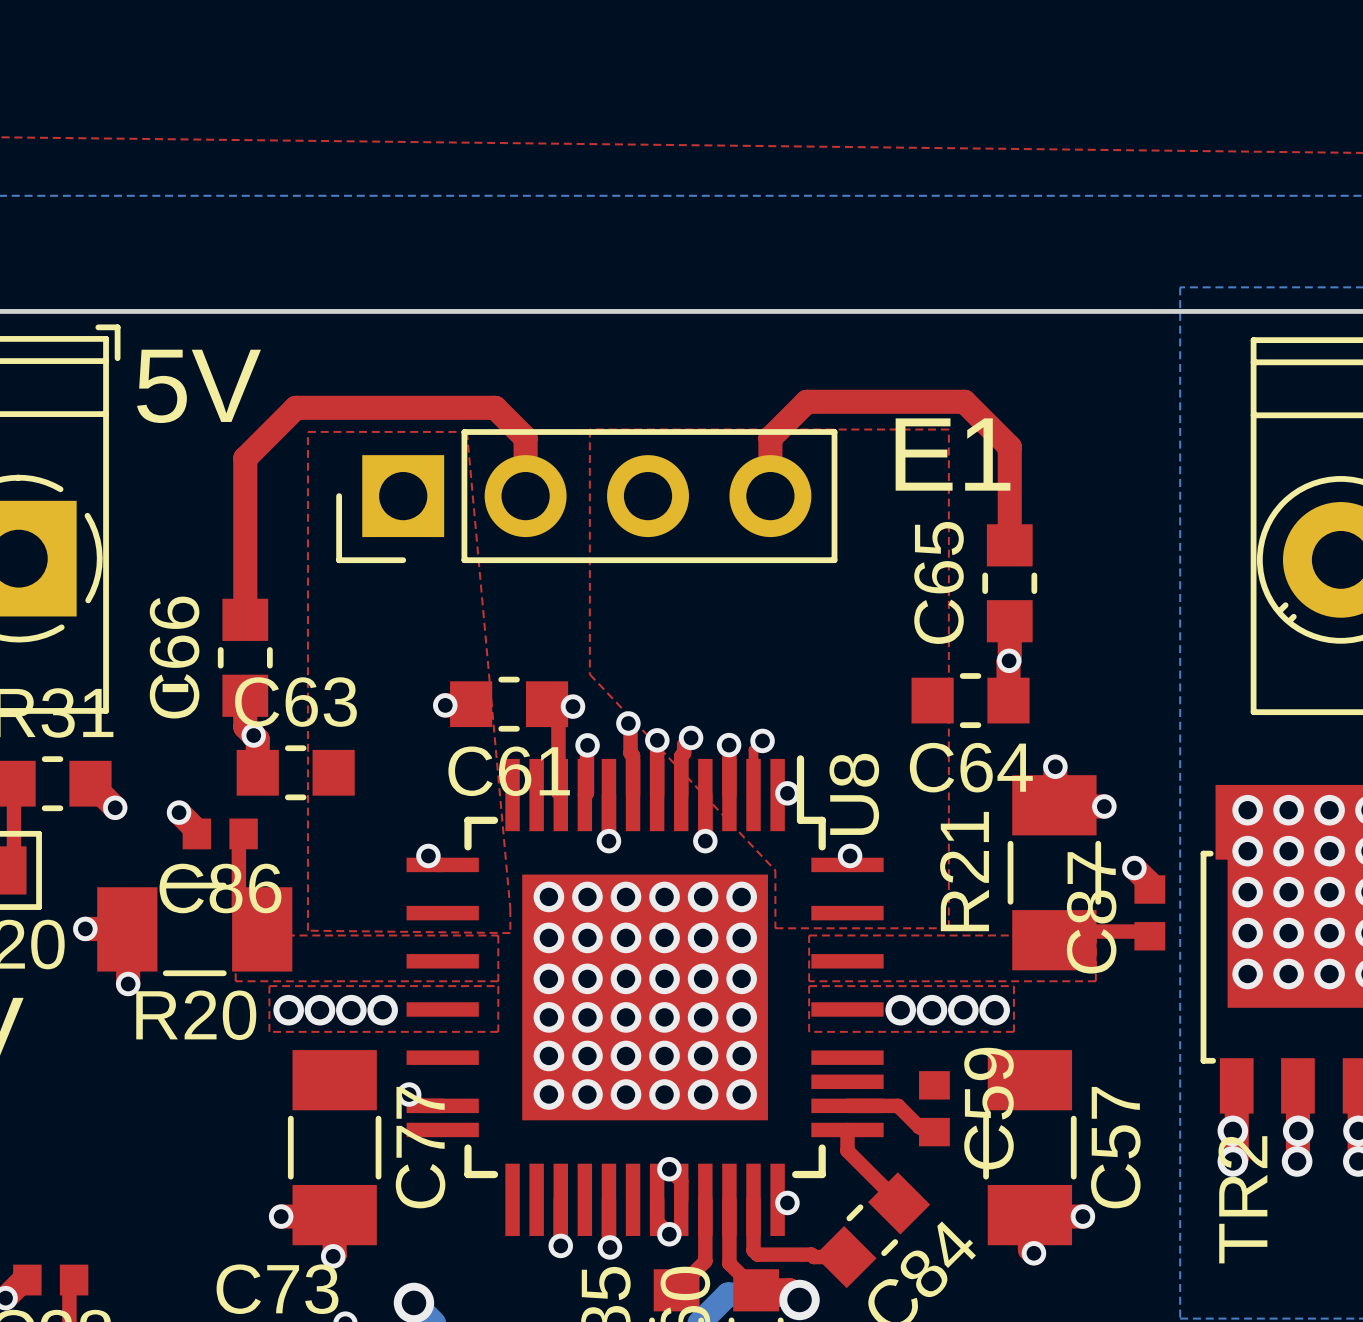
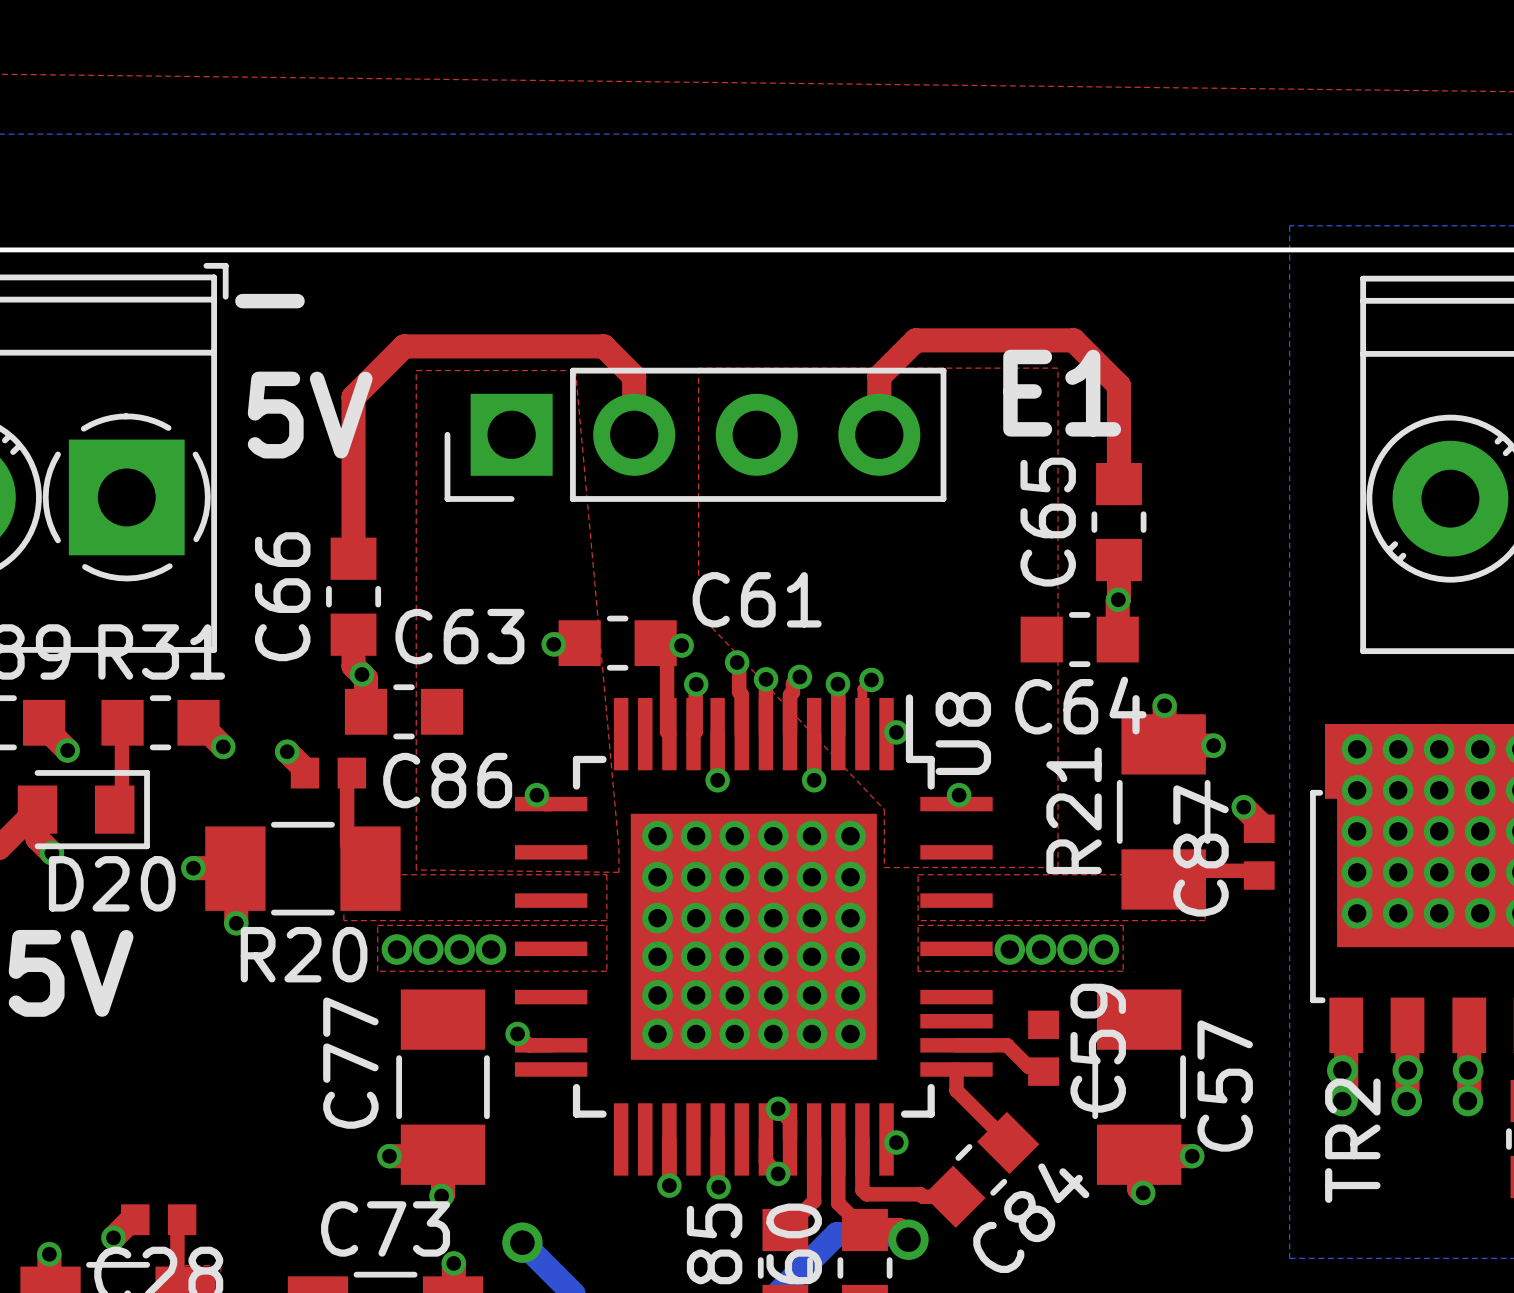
text position: 5V (198, 386) -> 5V (310, 415)
text position: - (175, 688) -> - (269, 301)
C63 name position: C63 (295, 702) -> C63 (459, 636)
C61 name position: C61 (509, 771) -> C61 (757, 599)
C86 name position: C86 (220, 888) -> C86 (447, 780)
C77 name position: C77 (420, 1147) -> C77 (350, 1063)

